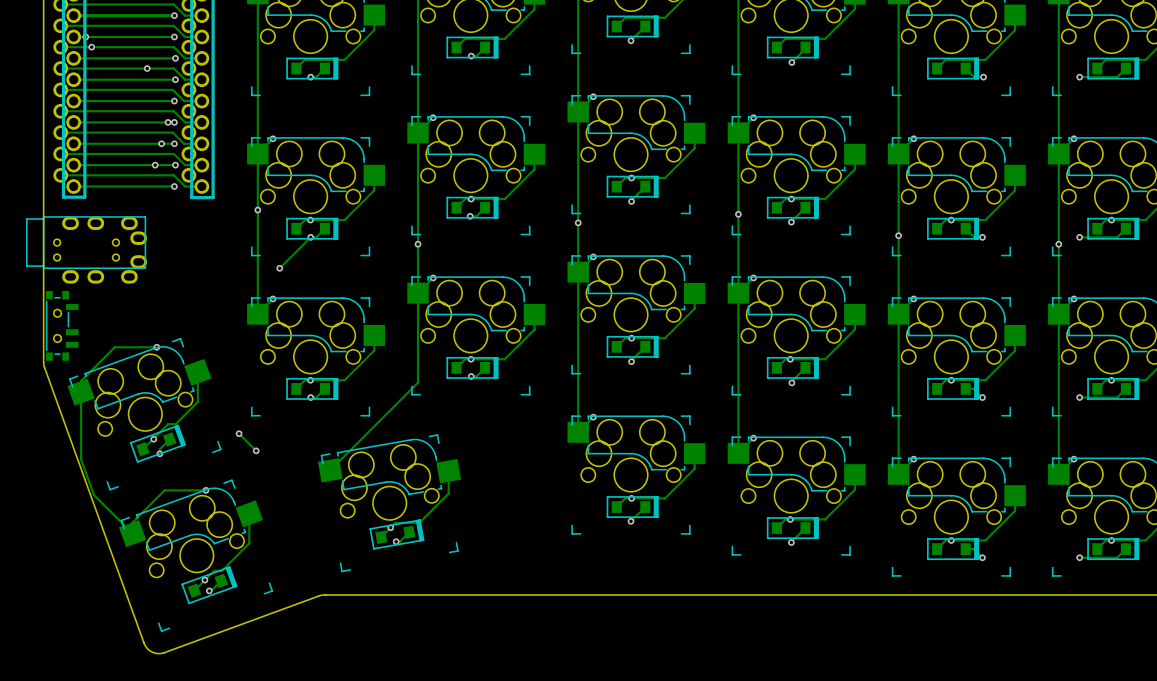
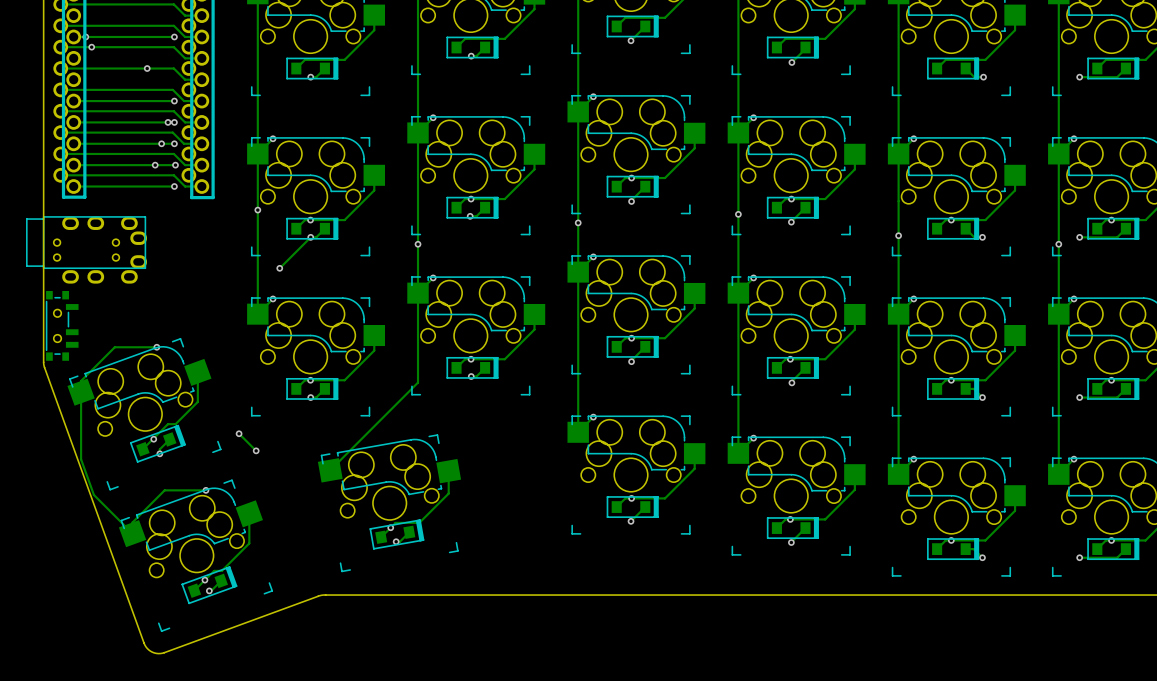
track: (174, 15) (73, 15) -> none
via: (174, 15) -> none
track: (175, 58) (73, 58) -> none
via: (175, 58) -> none
track: (175, 79) (73, 79) -> none
via: (175, 79) -> none

